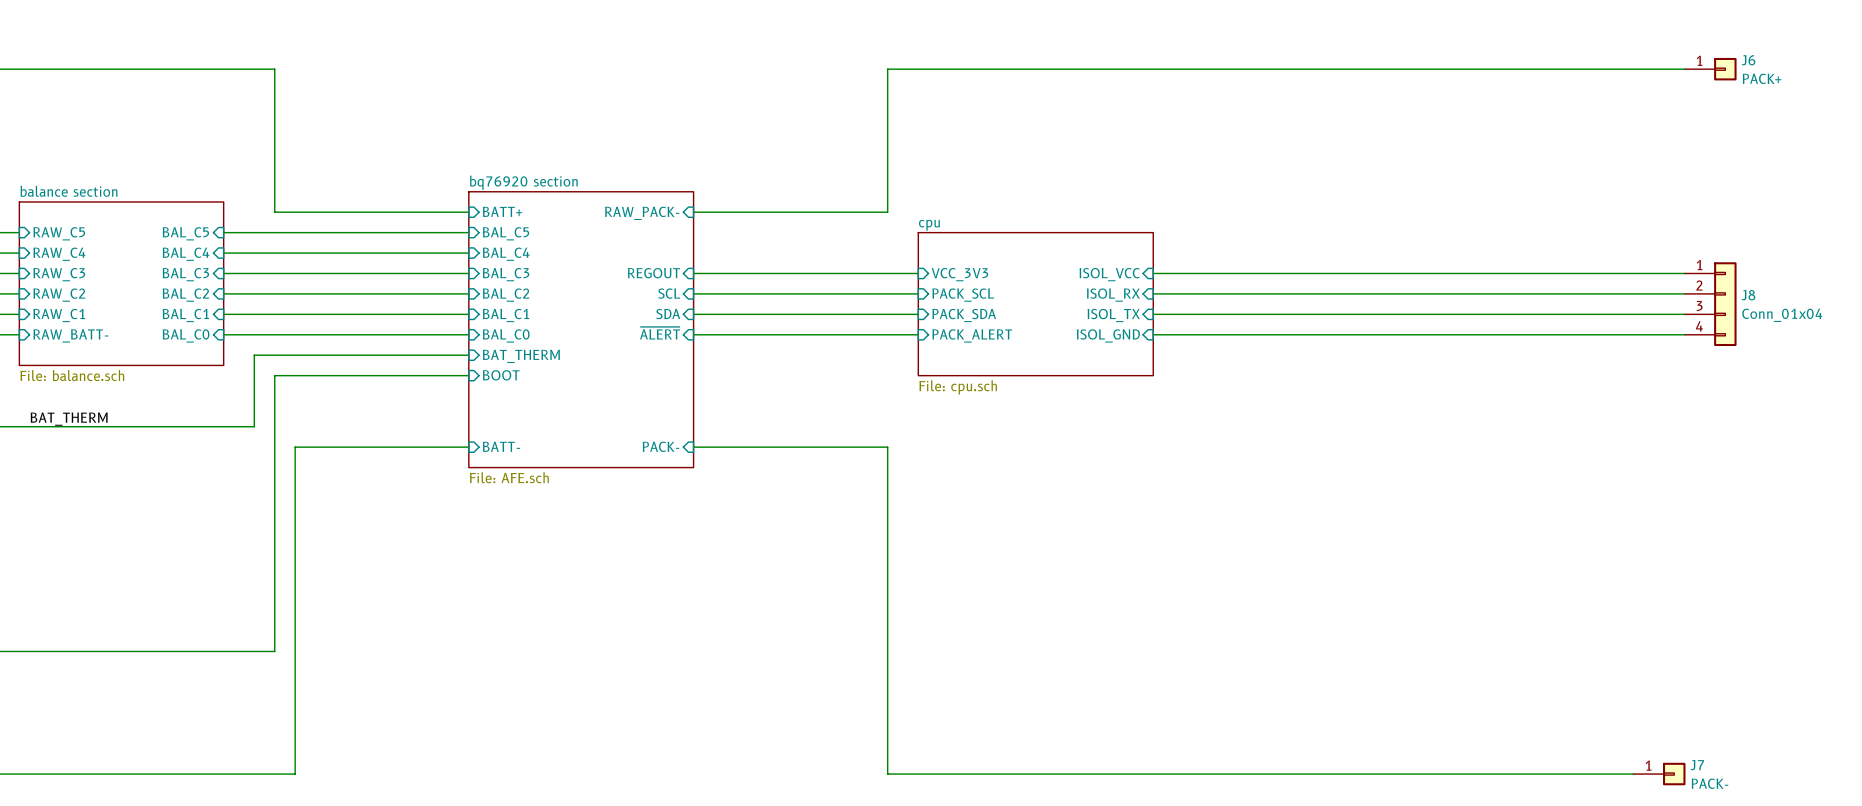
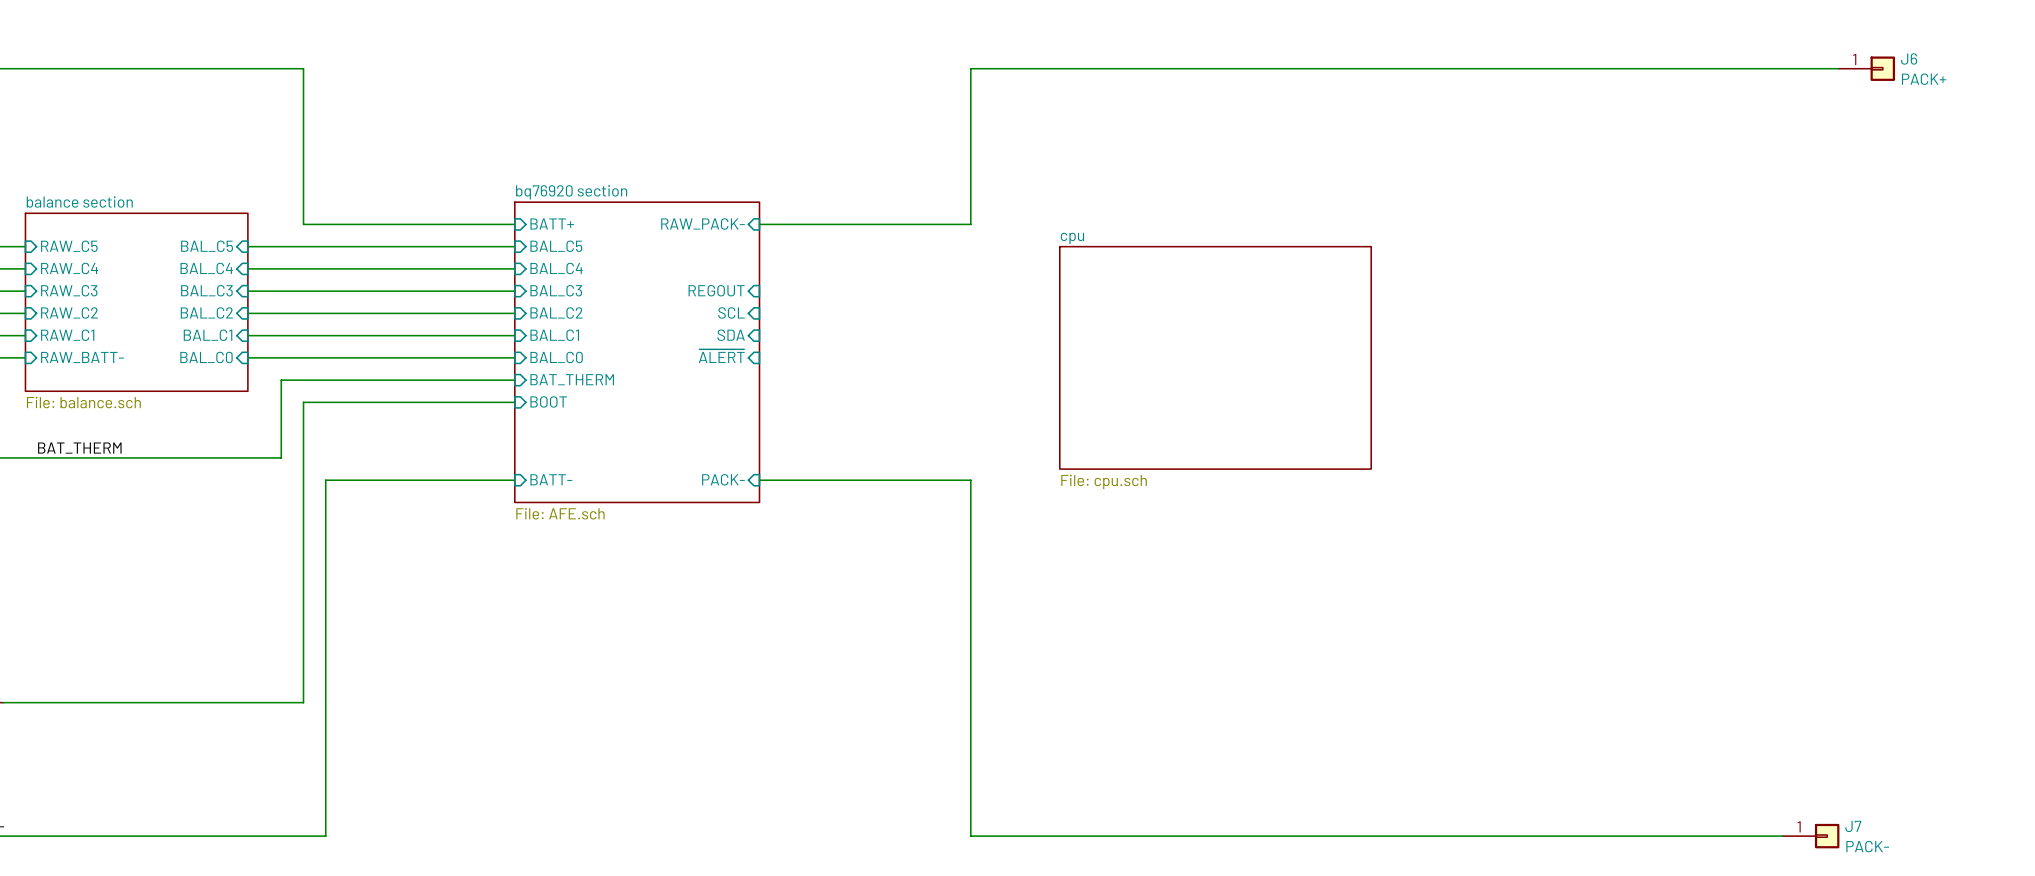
wire: (693, 273) (918, 273) -> none
wire: (1153, 273) (1684, 273) -> none
sheet pin: VCC_3V3 (959, 274) -> none
sheet pin: ISOL_VCC (1109, 274) -> none
wire: (693, 293) (918, 293) -> none
wire: (1153, 293) (1684, 293) -> none
sheet pin: PACK_SCL (963, 295) -> none
sheet pin: ISOL_RX (1113, 295) -> none
sheet cpu: File: cpu.sch (1035, 304) -> none
J8: Conn_01x04 (1710, 304) -> none
wire: (693, 314) (918, 314) -> none
wire: (1153, 314) (1684, 314) -> none
sheet pin: PACK_SDA (964, 315) -> none
sheet pin: ISOL_TX (1113, 315) -> none
wire: (693, 334) (918, 334) -> none
sheet cpu: none -> File: cpu.sch (1215, 357)
wire: (1153, 334) (1684, 334) -> none
sheet pin: PACK_ALERT (972, 335) -> none
sheet pin: ISOL_GND (1108, 335) -> none

